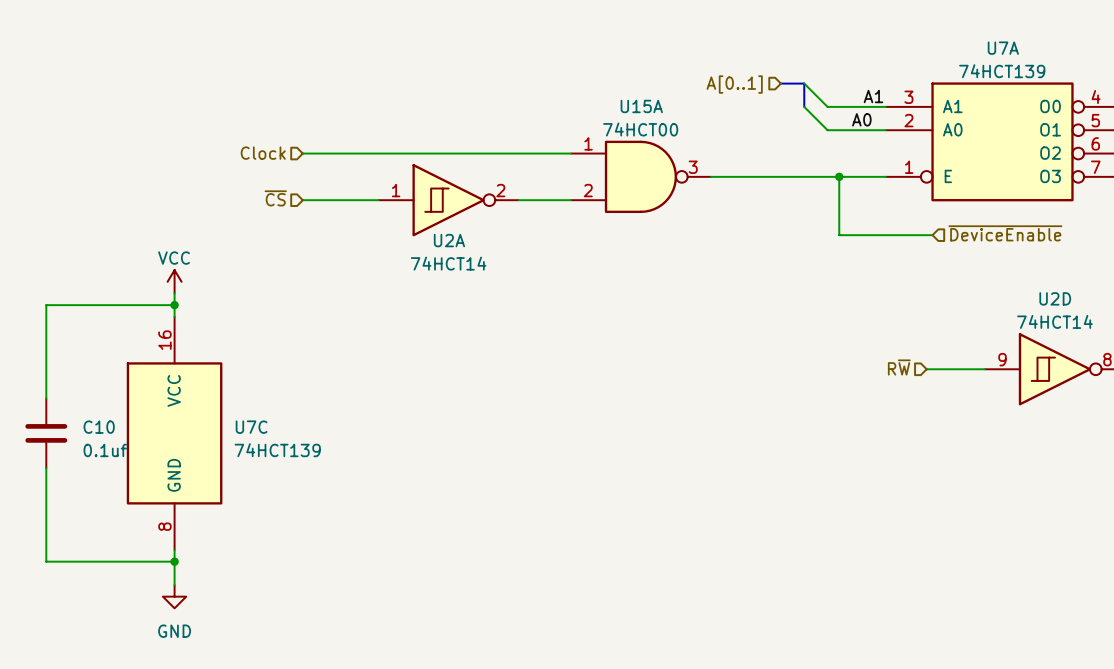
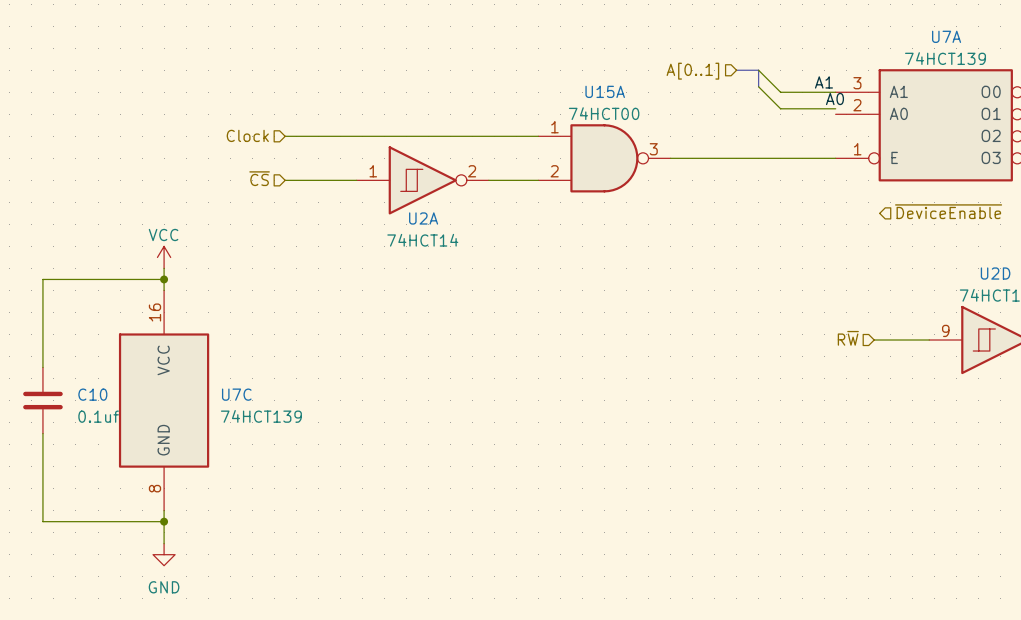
wire: none -> (758, 86) (780, 108)
bus: (804, 101) (804, 106) -> none
wire: (804, 106) (827, 130) (885, 130) -> none
label position: A0 (861, 119) -> A0 (834, 98)
wire: none -> (780, 108) (835, 108)
wire: (839, 176) (839, 235) (932, 235) -> none
junction: (839, 176) -> none

